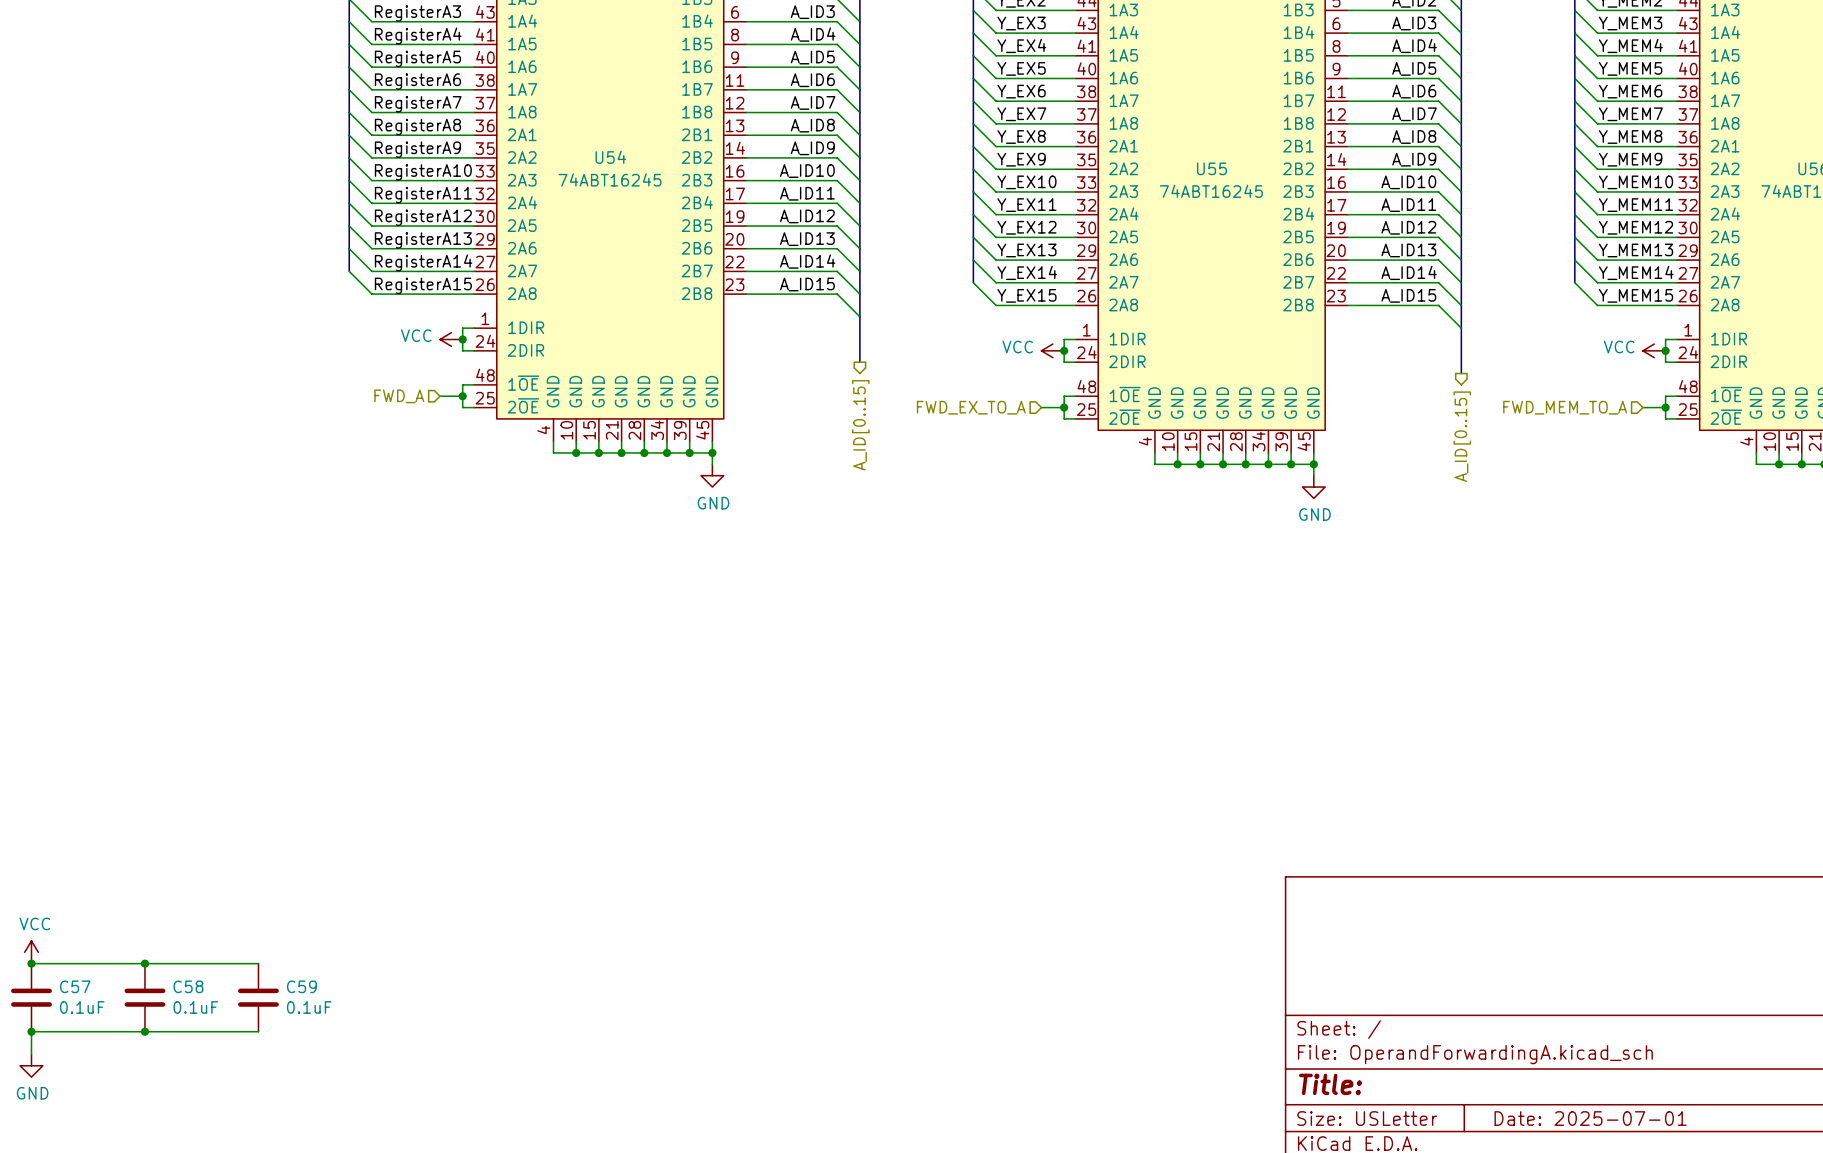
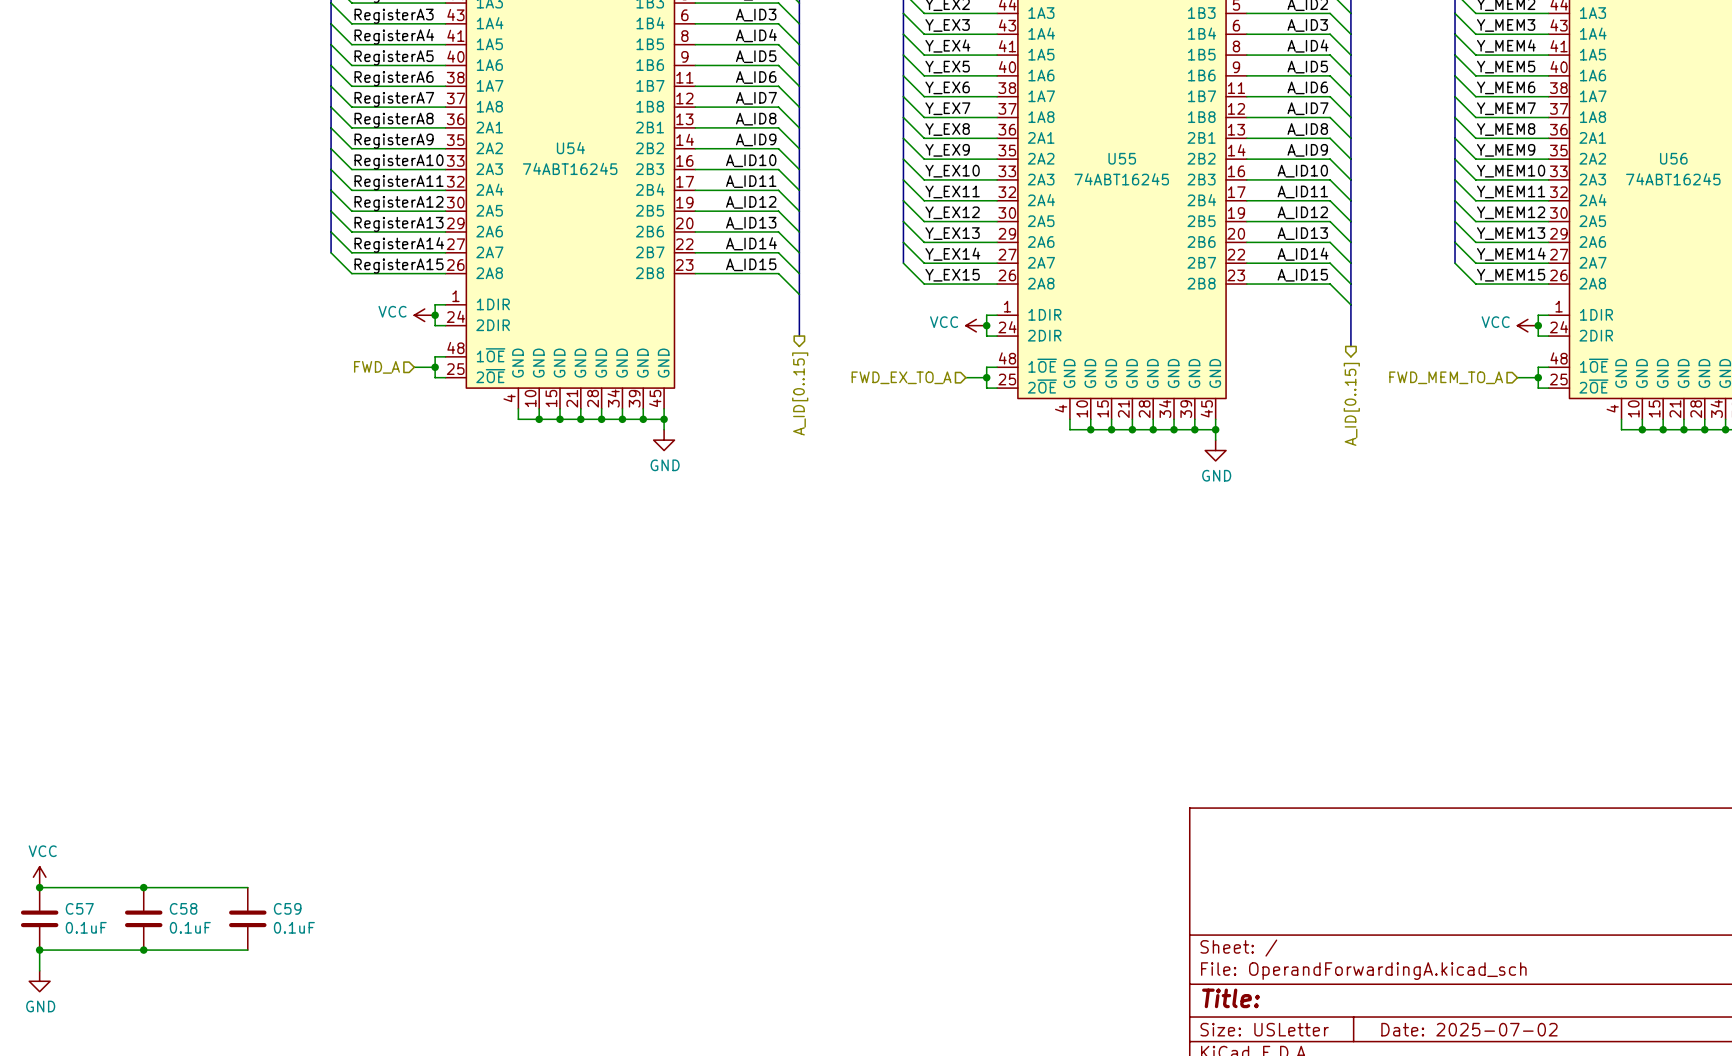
title block: Date: 2025-07-01 (1590, 1118) -> Date: 2025-07-02 (1469, 1029)

